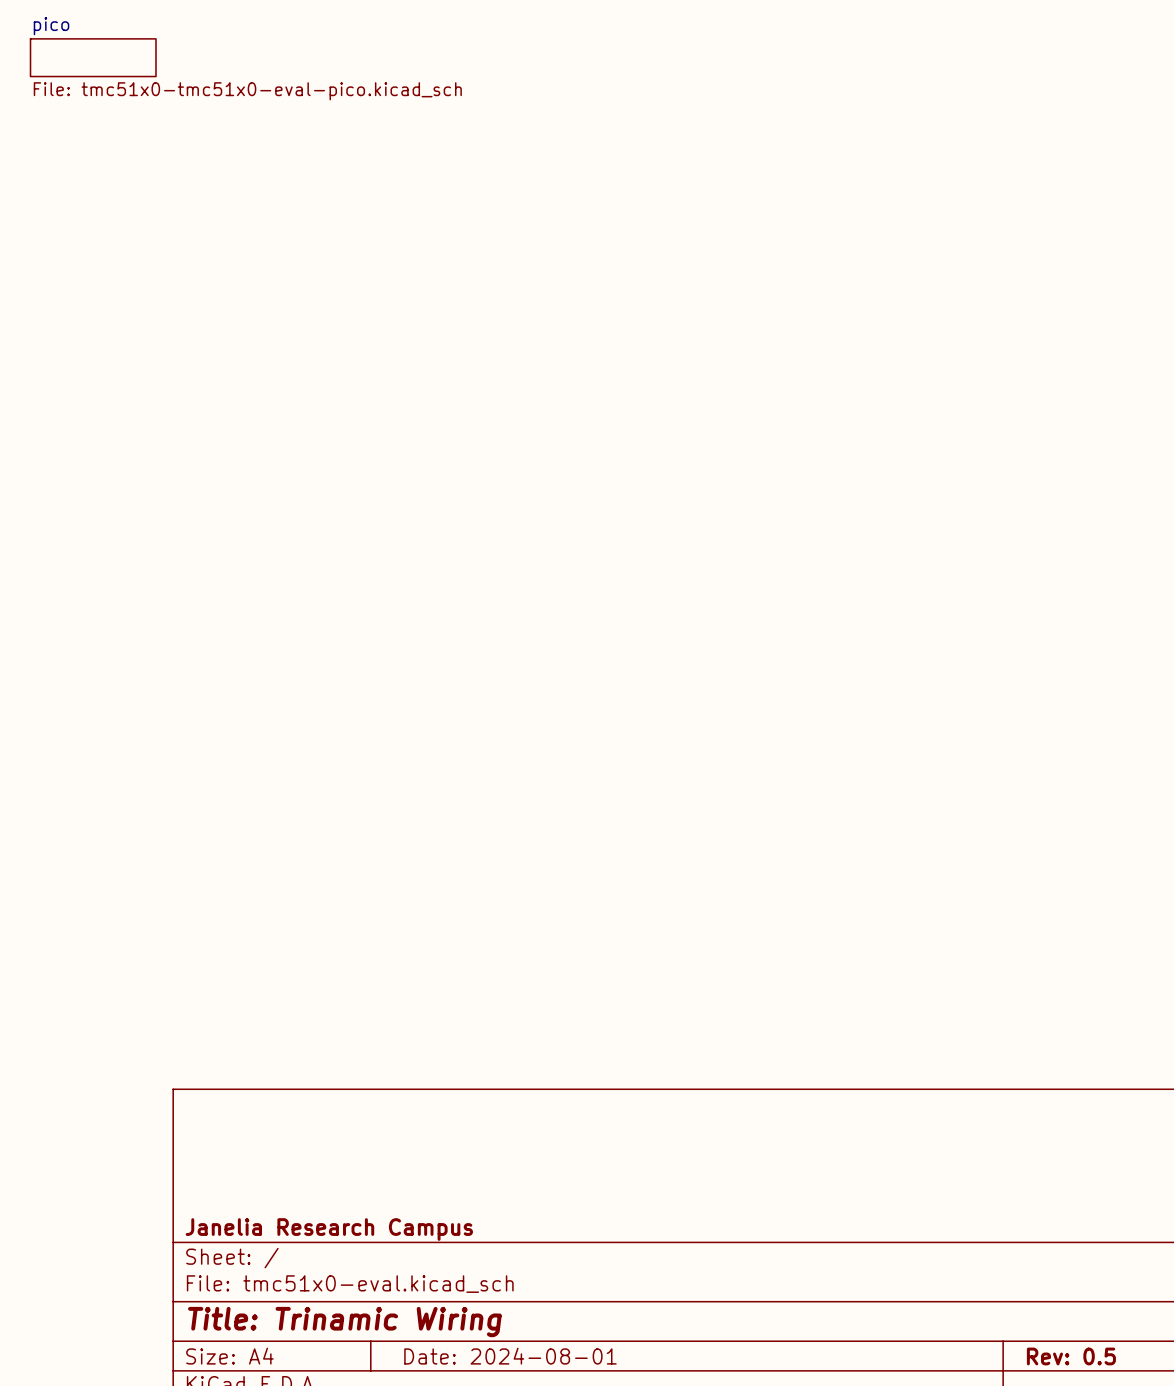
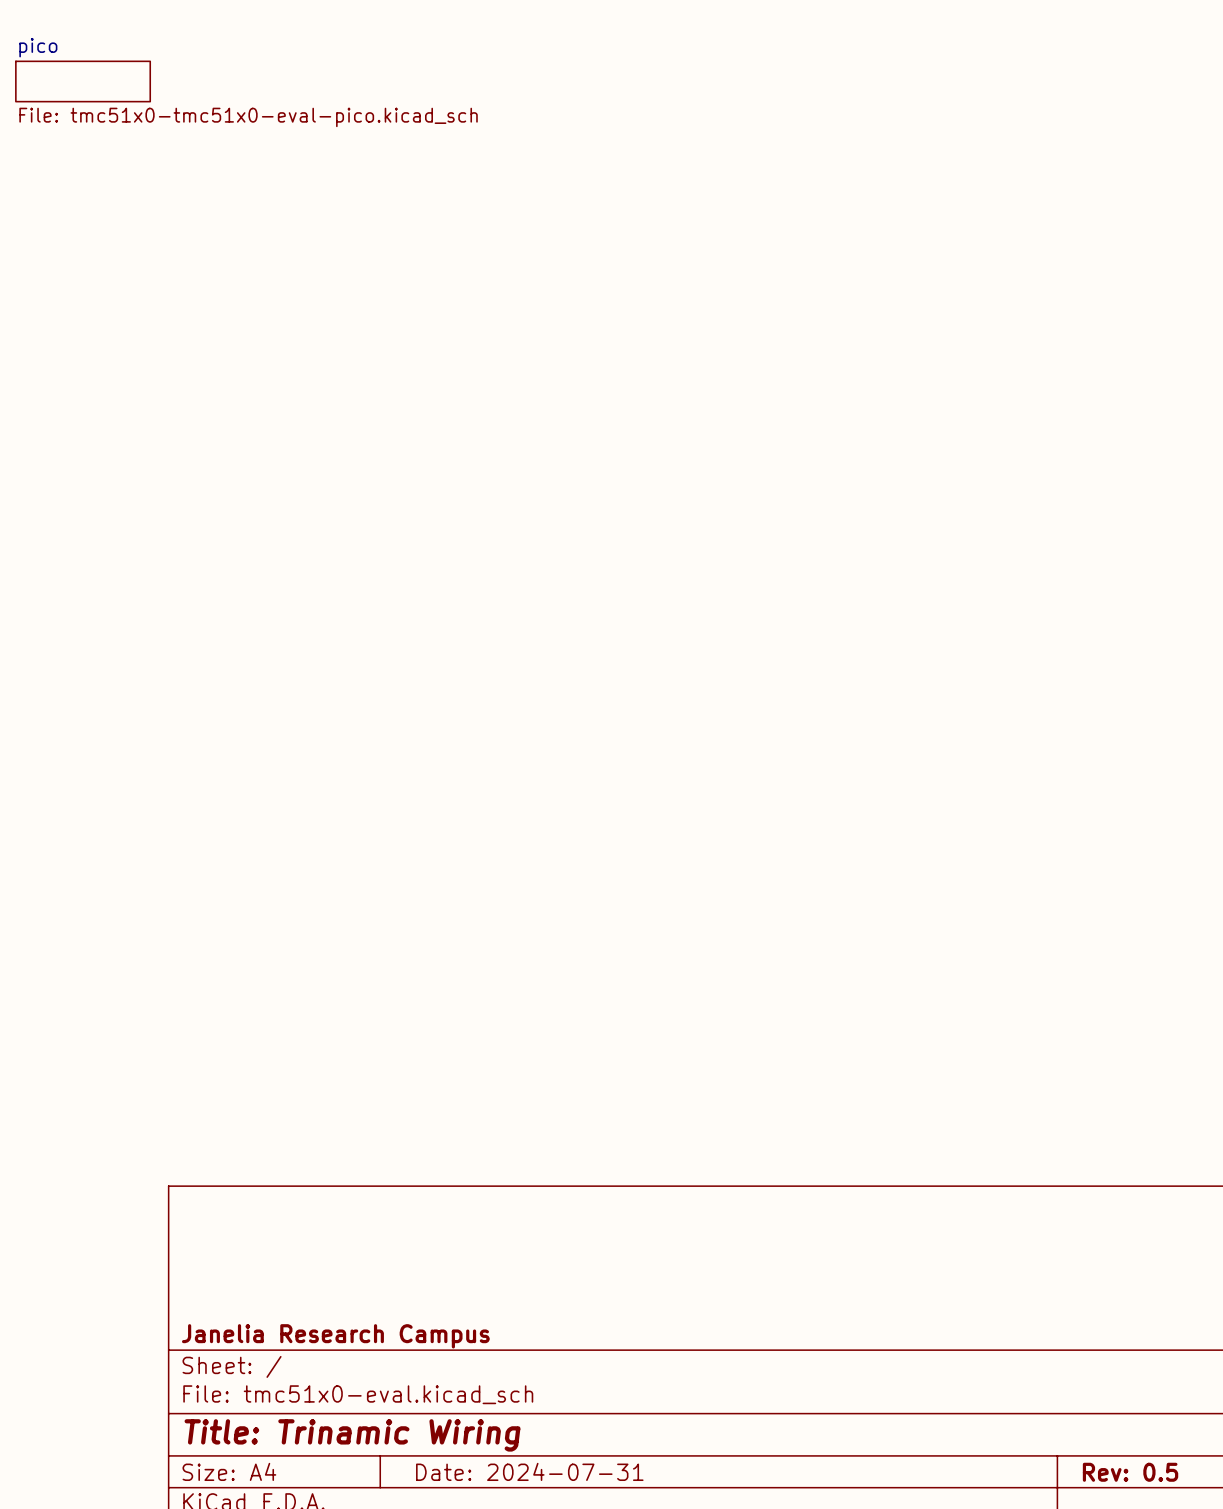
title block: Date: 2024-08-01 (510, 1356) -> Date: 2024-07-31 (529, 1471)

